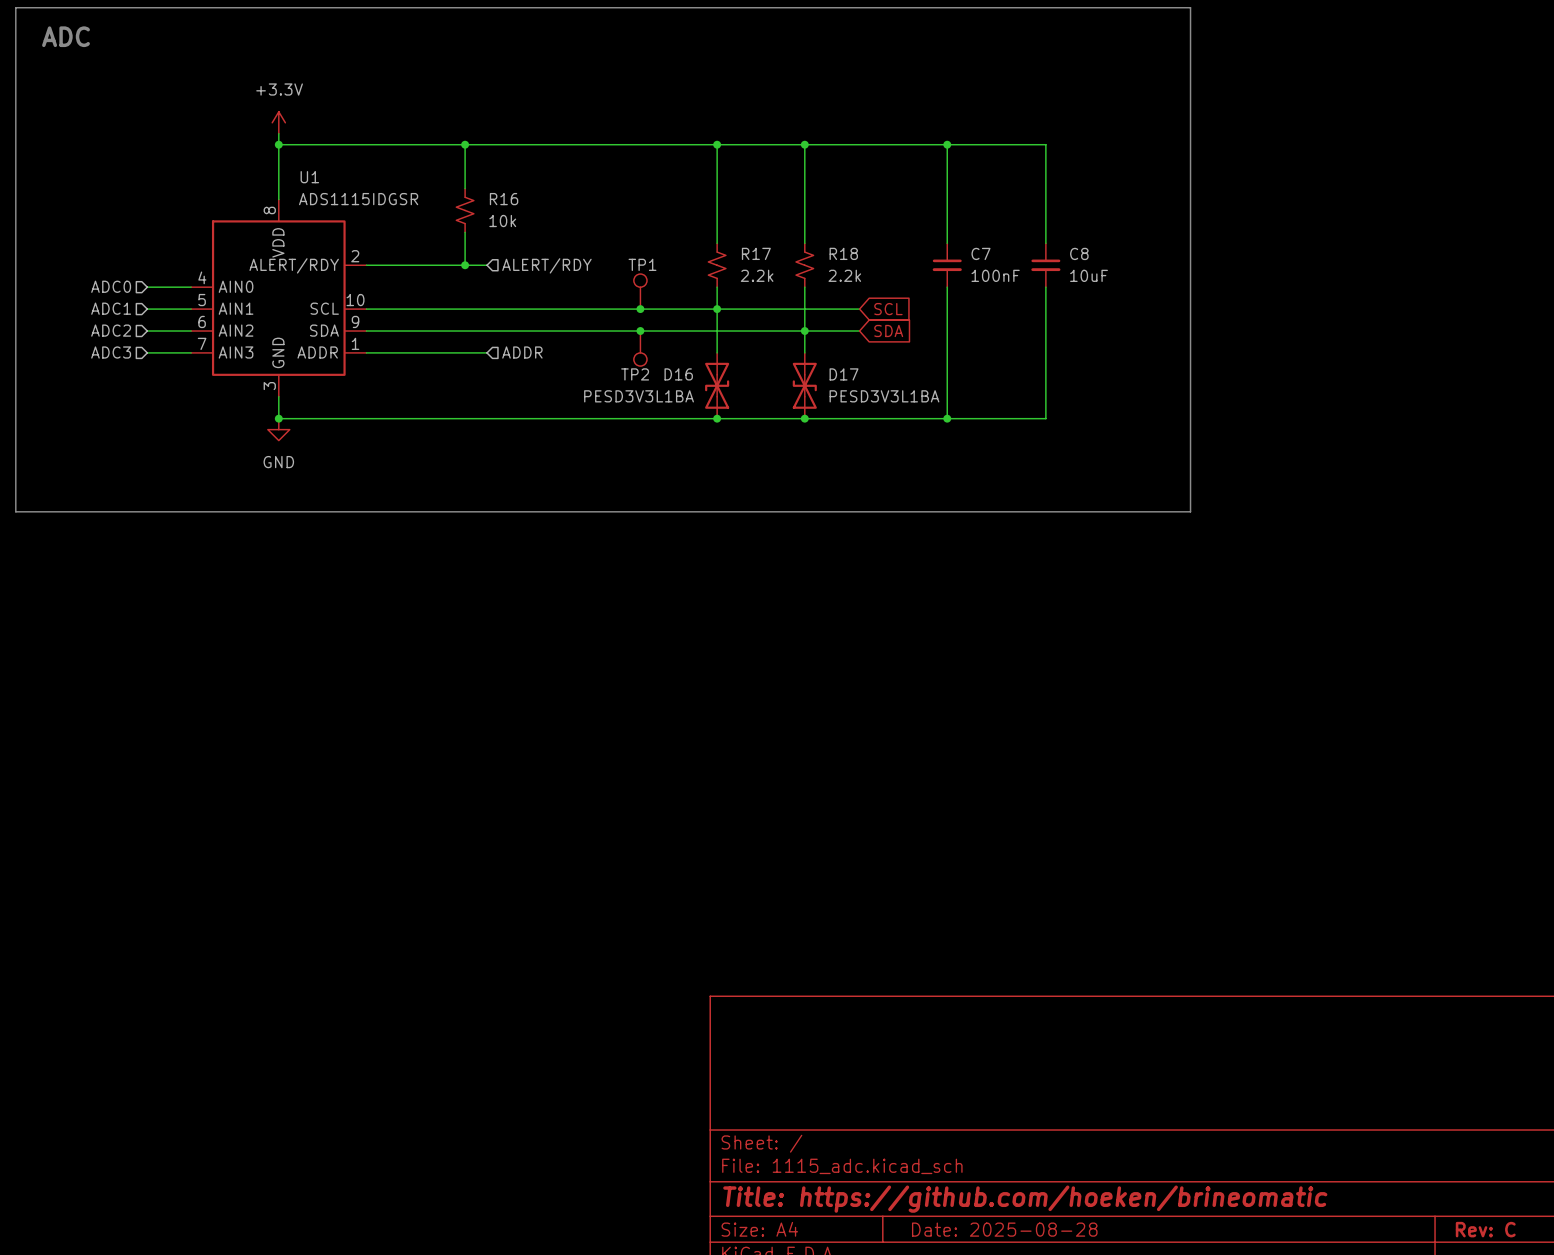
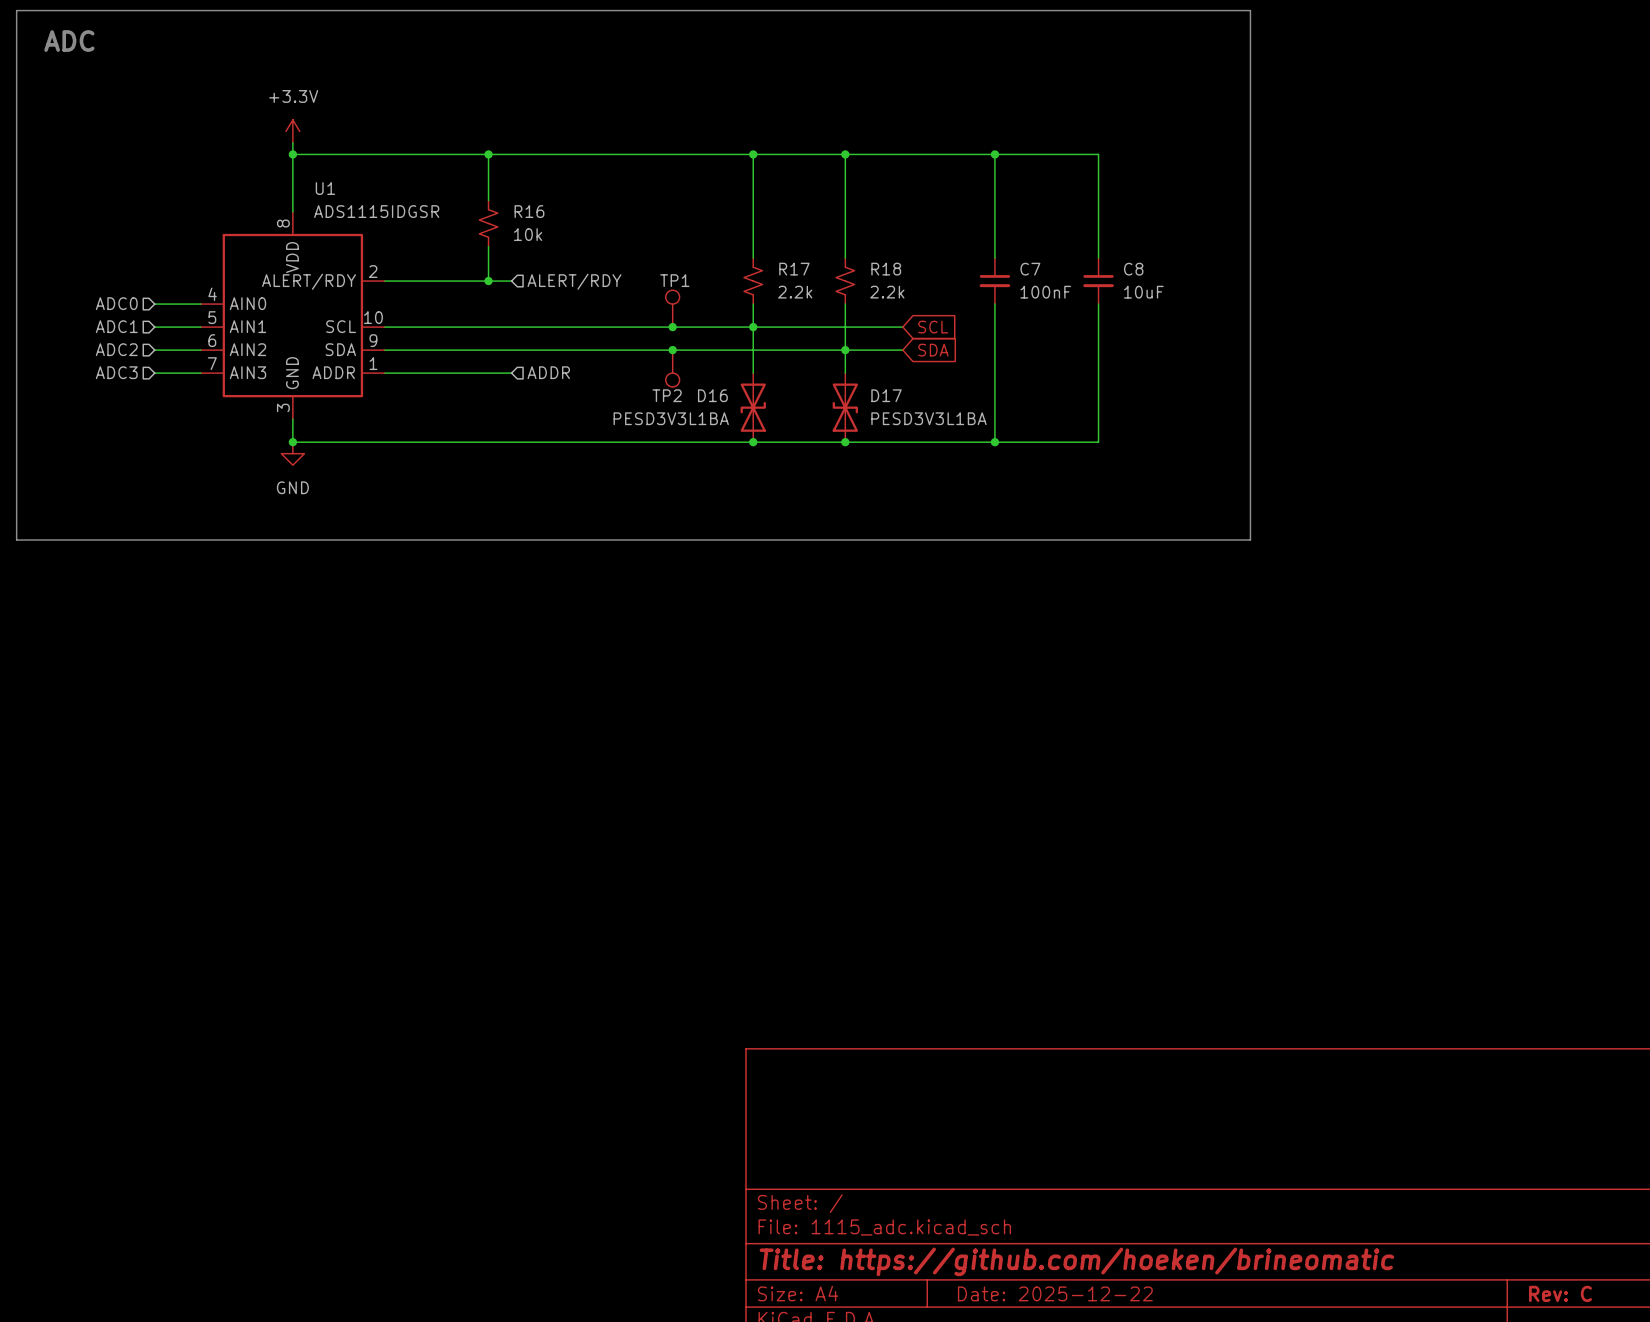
title block: Date: 2025-08-28 (1004, 1229) -> Date: 2025-12-22 (1055, 1293)

